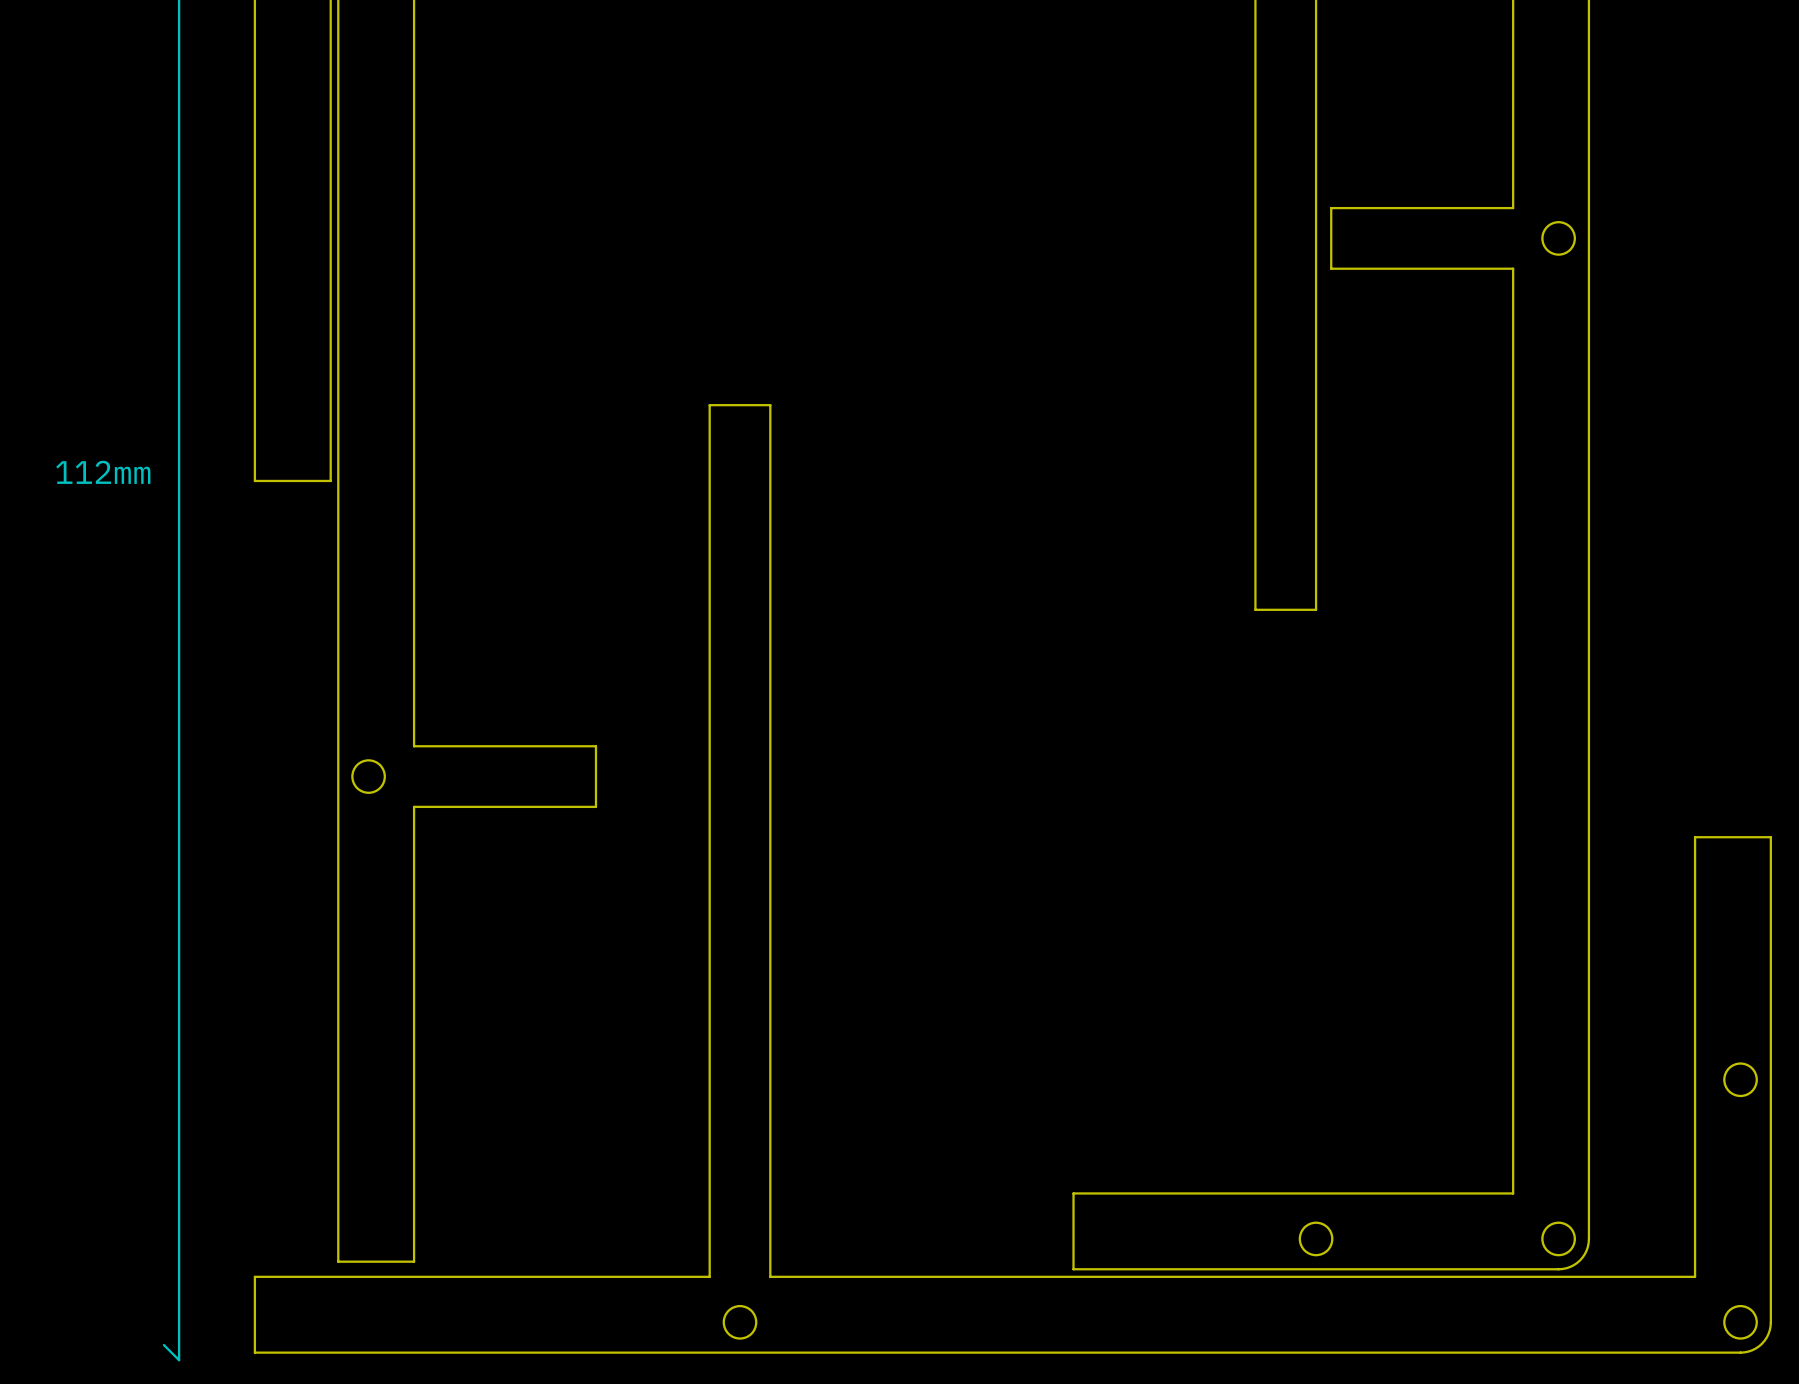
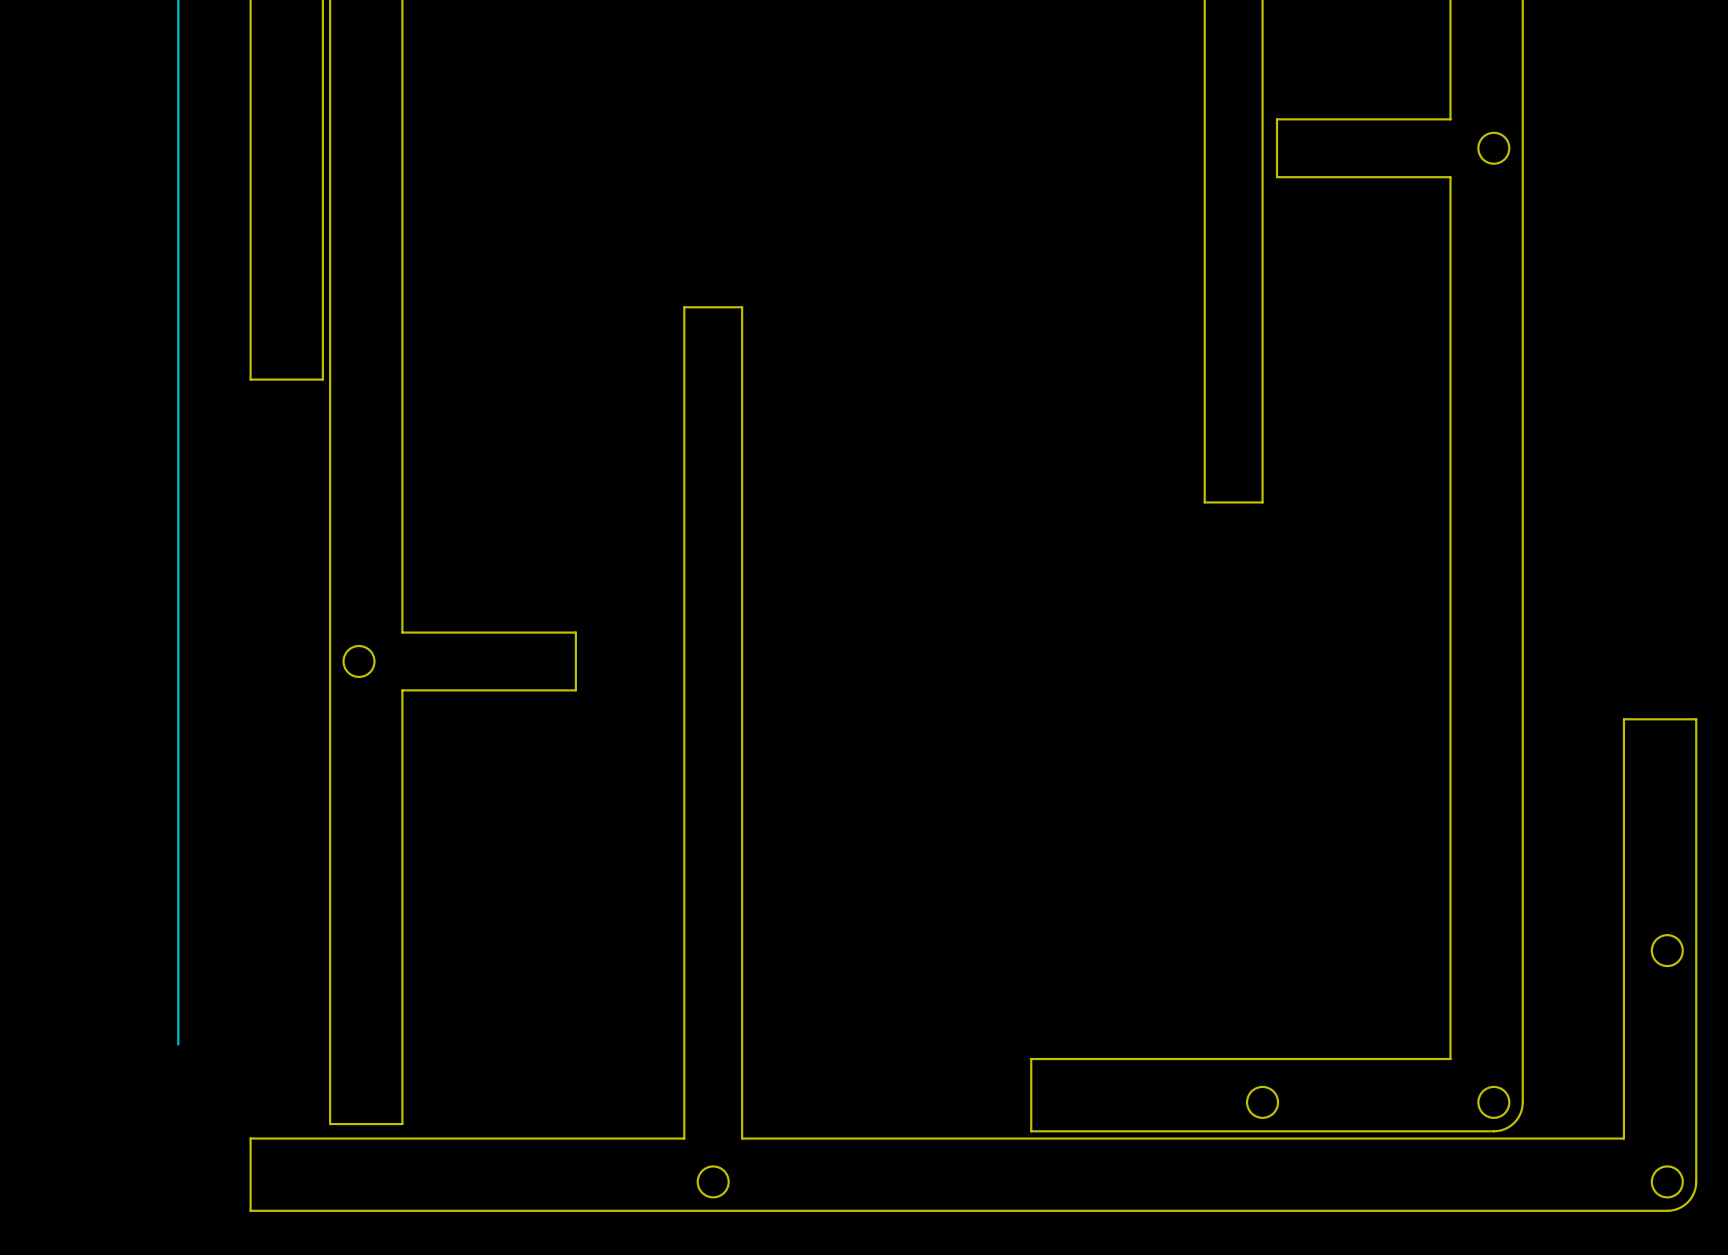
text: 112mm (103, 472) -> none
line: (179, 1178) (179, 1360) (163, 1345) -> none

